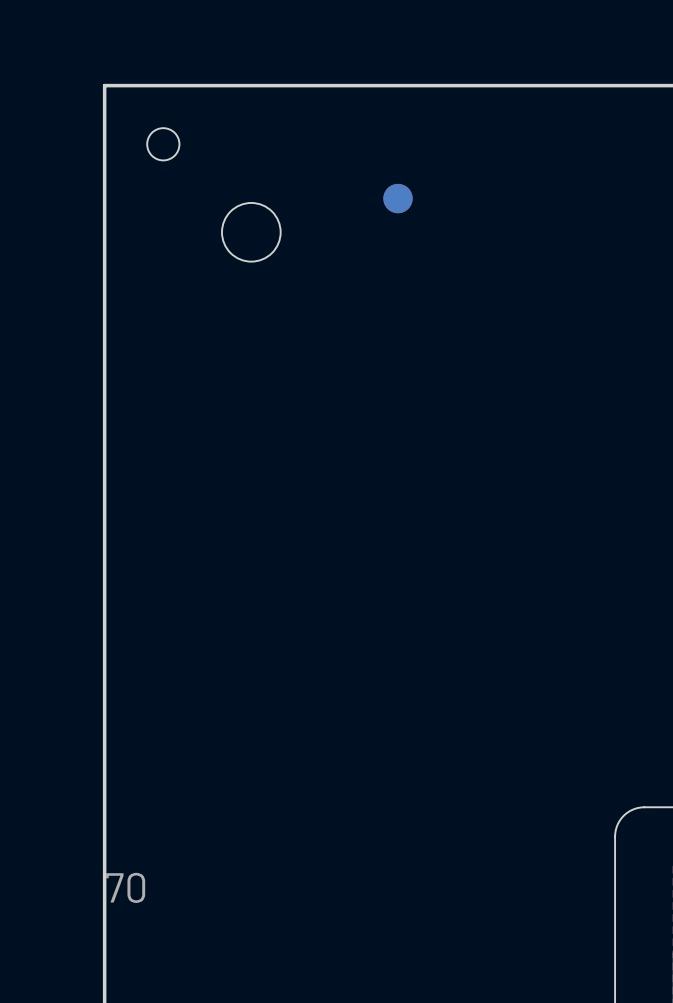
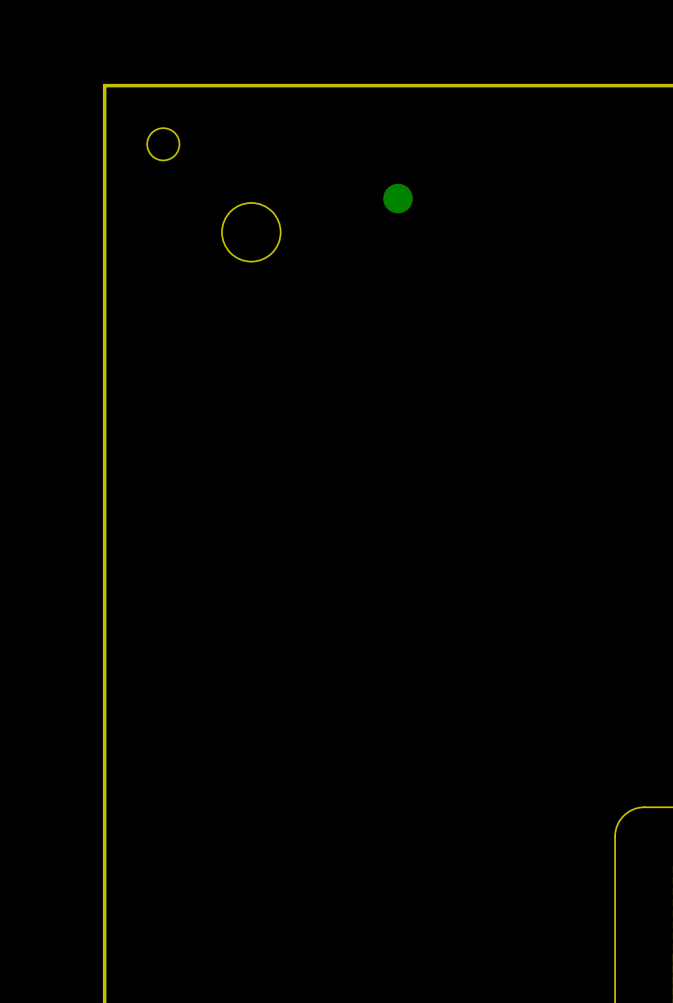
drawing: [106, 872, 146, 903] -> none

